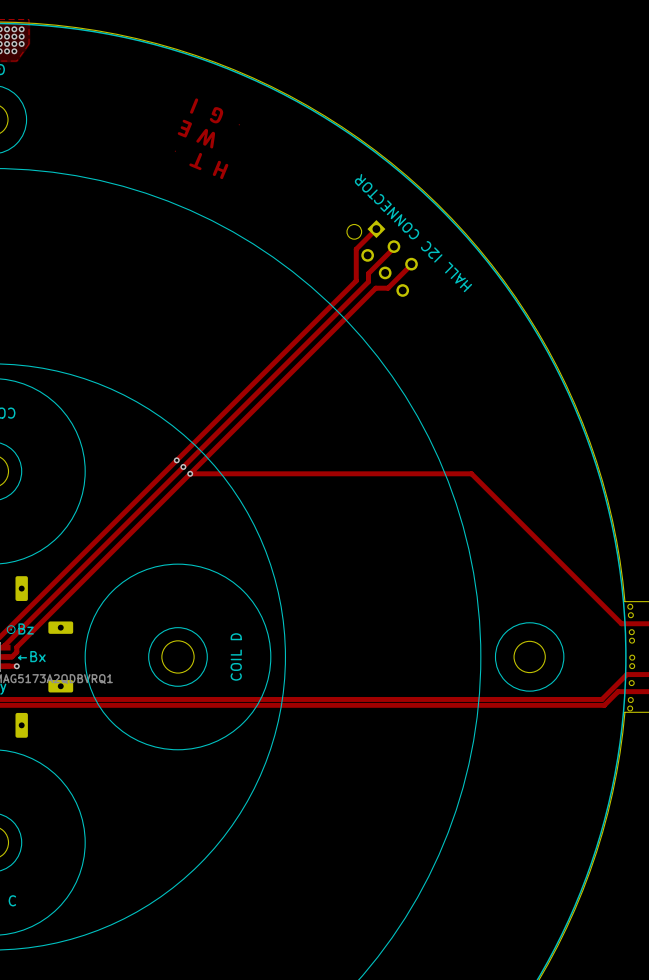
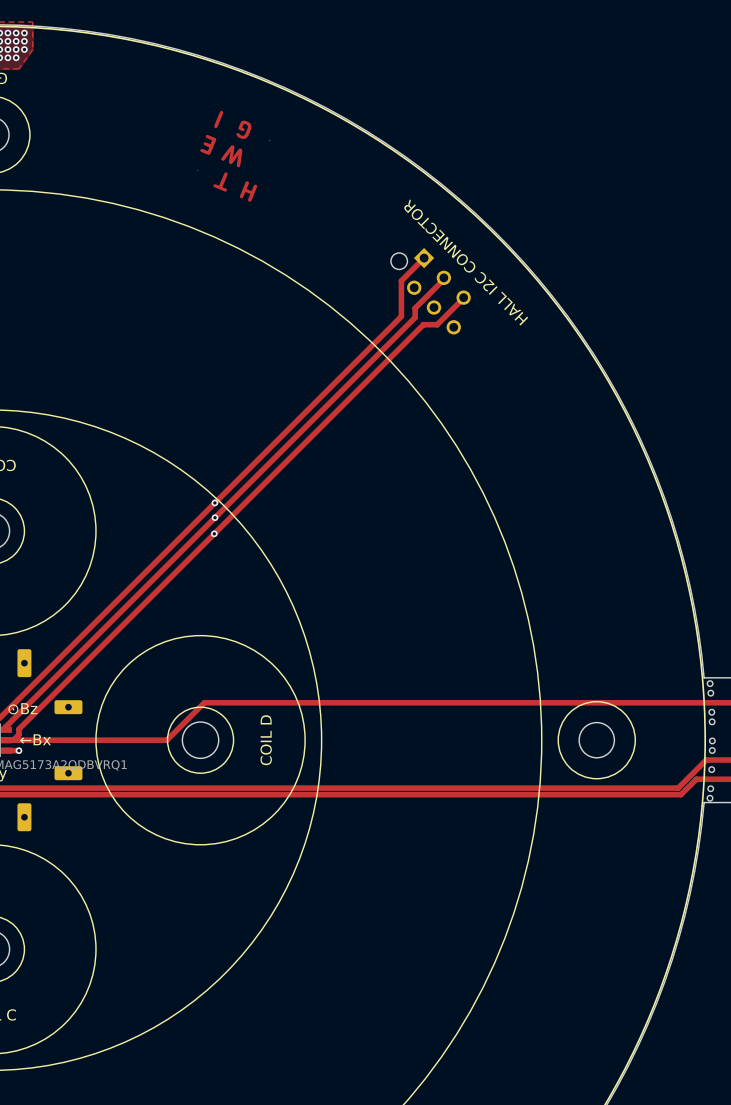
via: none -> (214, 502)
via: none -> (215, 517)
via: (176, 460) -> none
via: (183, 466) -> none
track: (190, 473) (471, 473) (621, 623) -> (13, 740) (166, 740) (204, 702) (700, 702)

